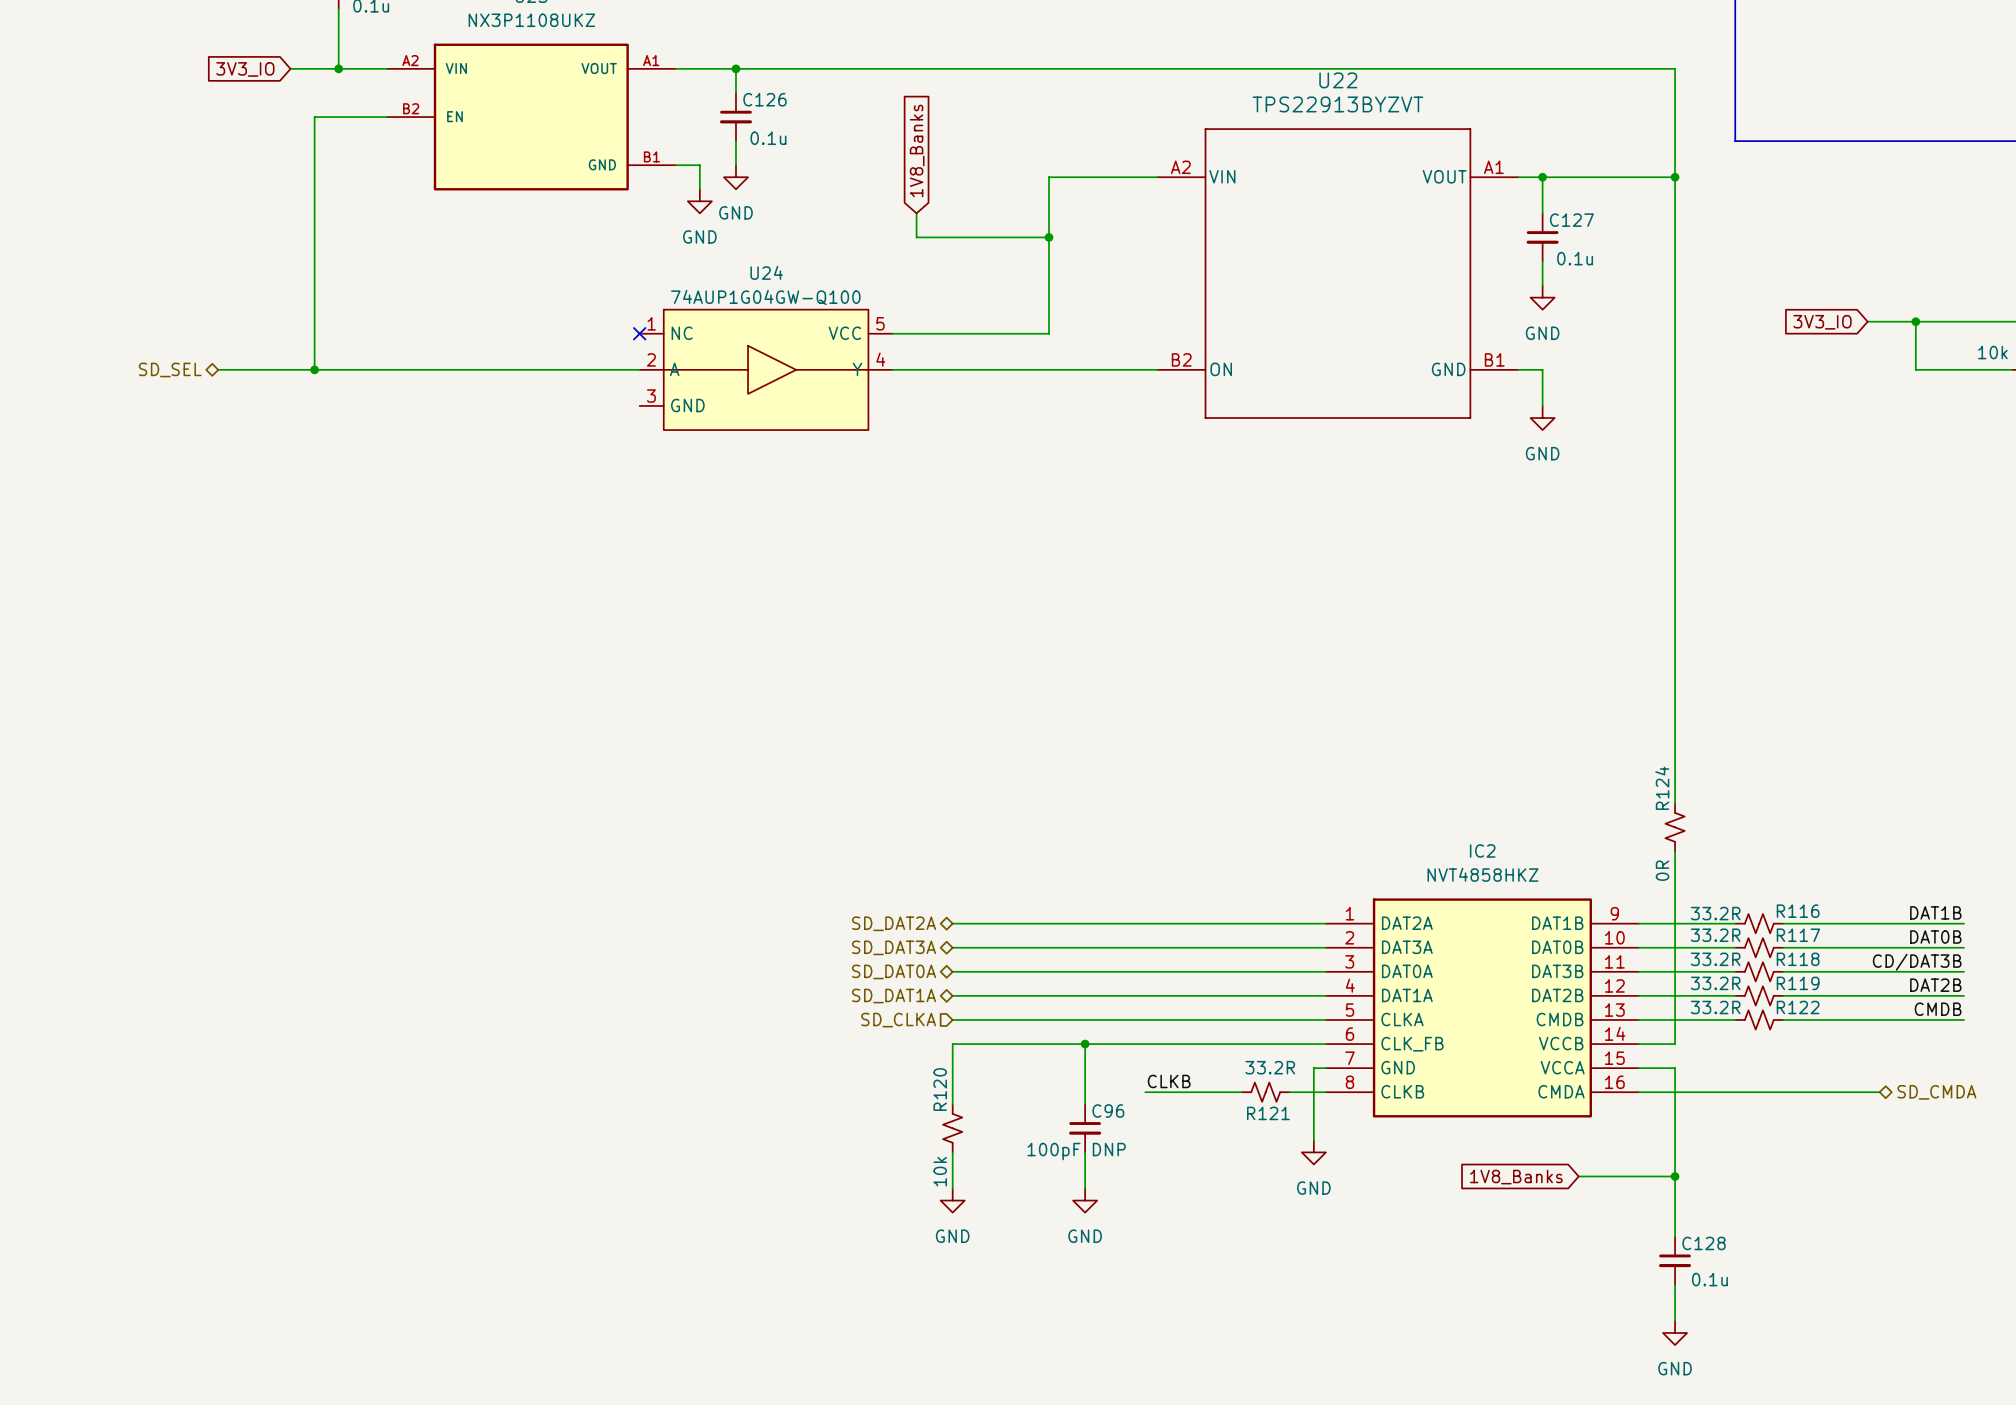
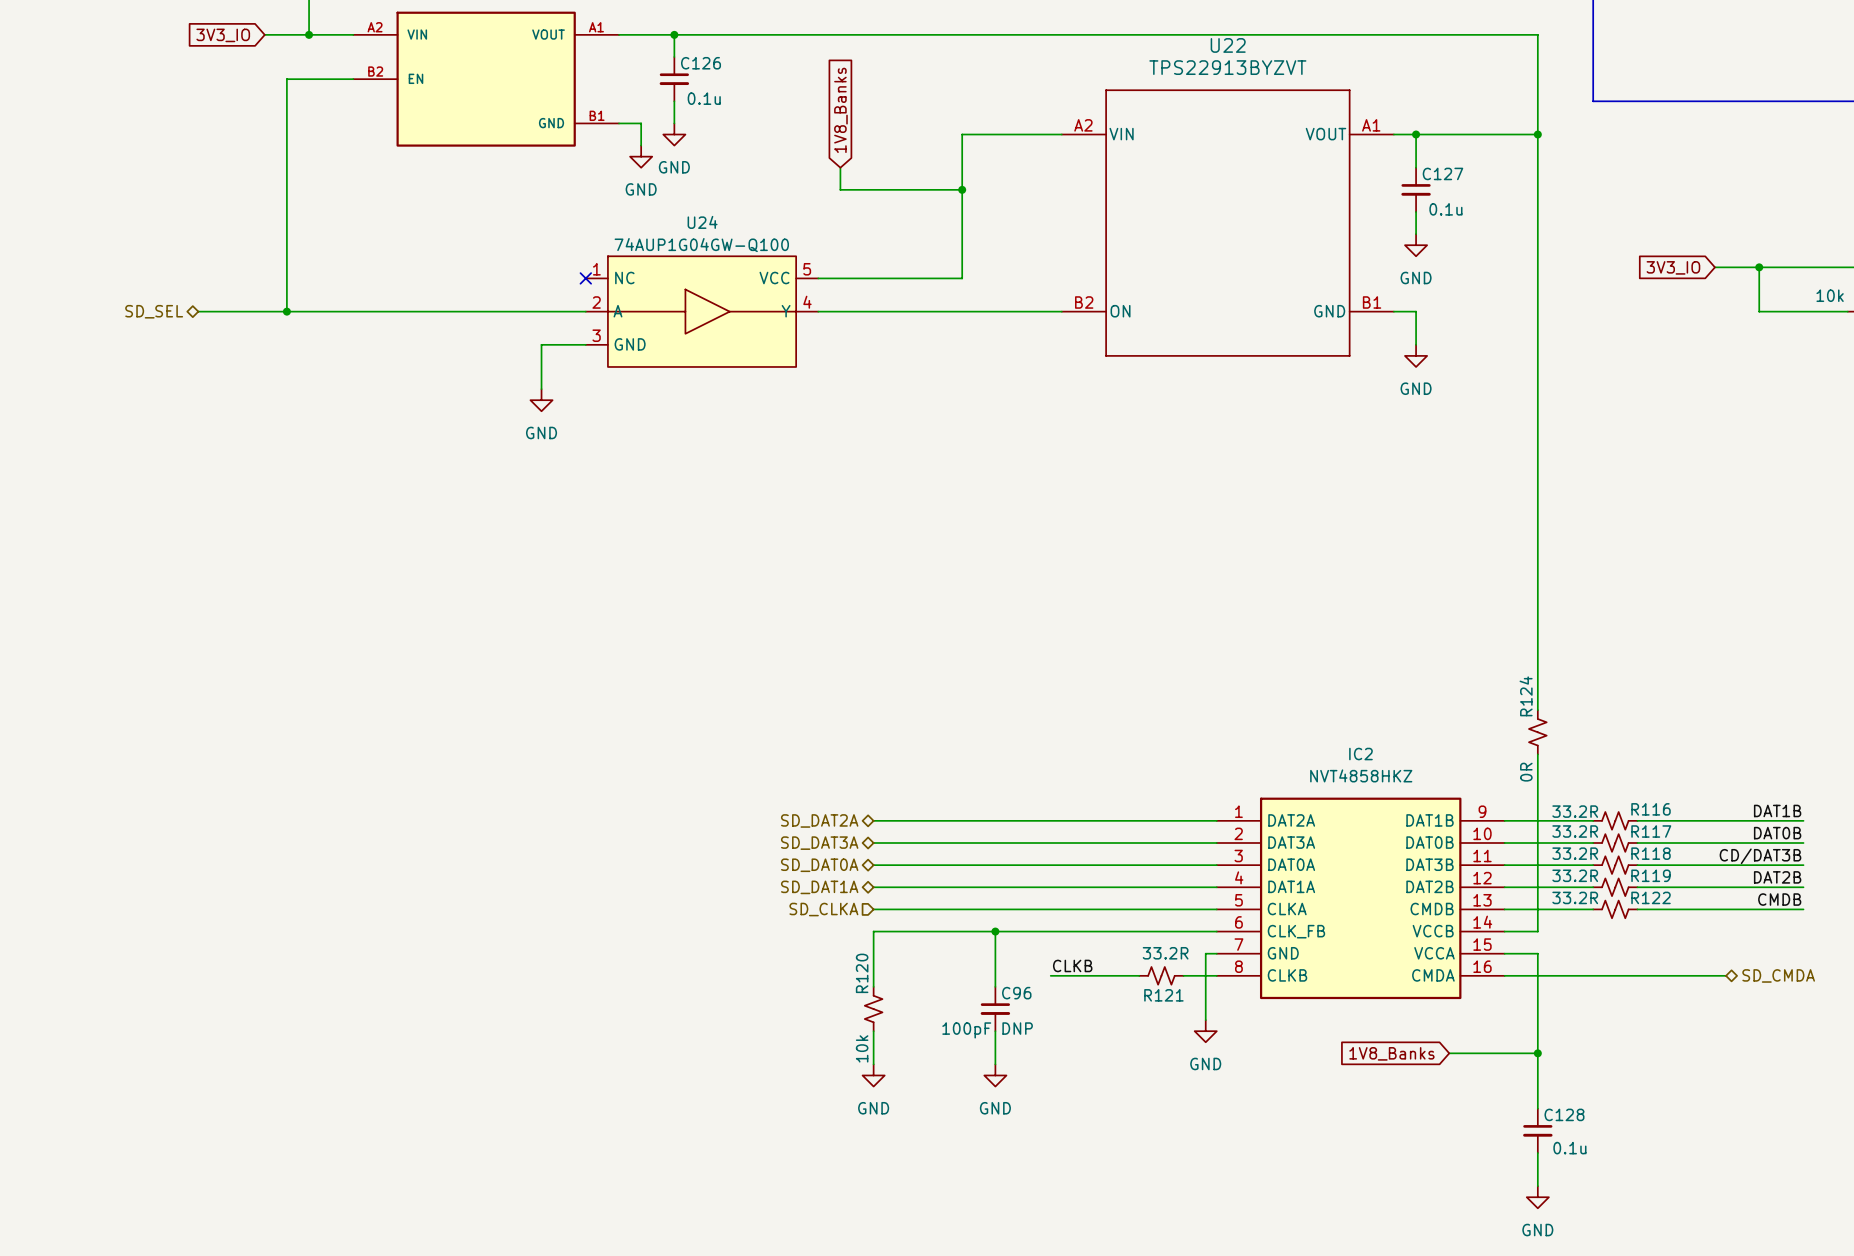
wire: none -> (585, 344) (541, 344) (541, 389)
power symbol: none -> GND (541, 400)

